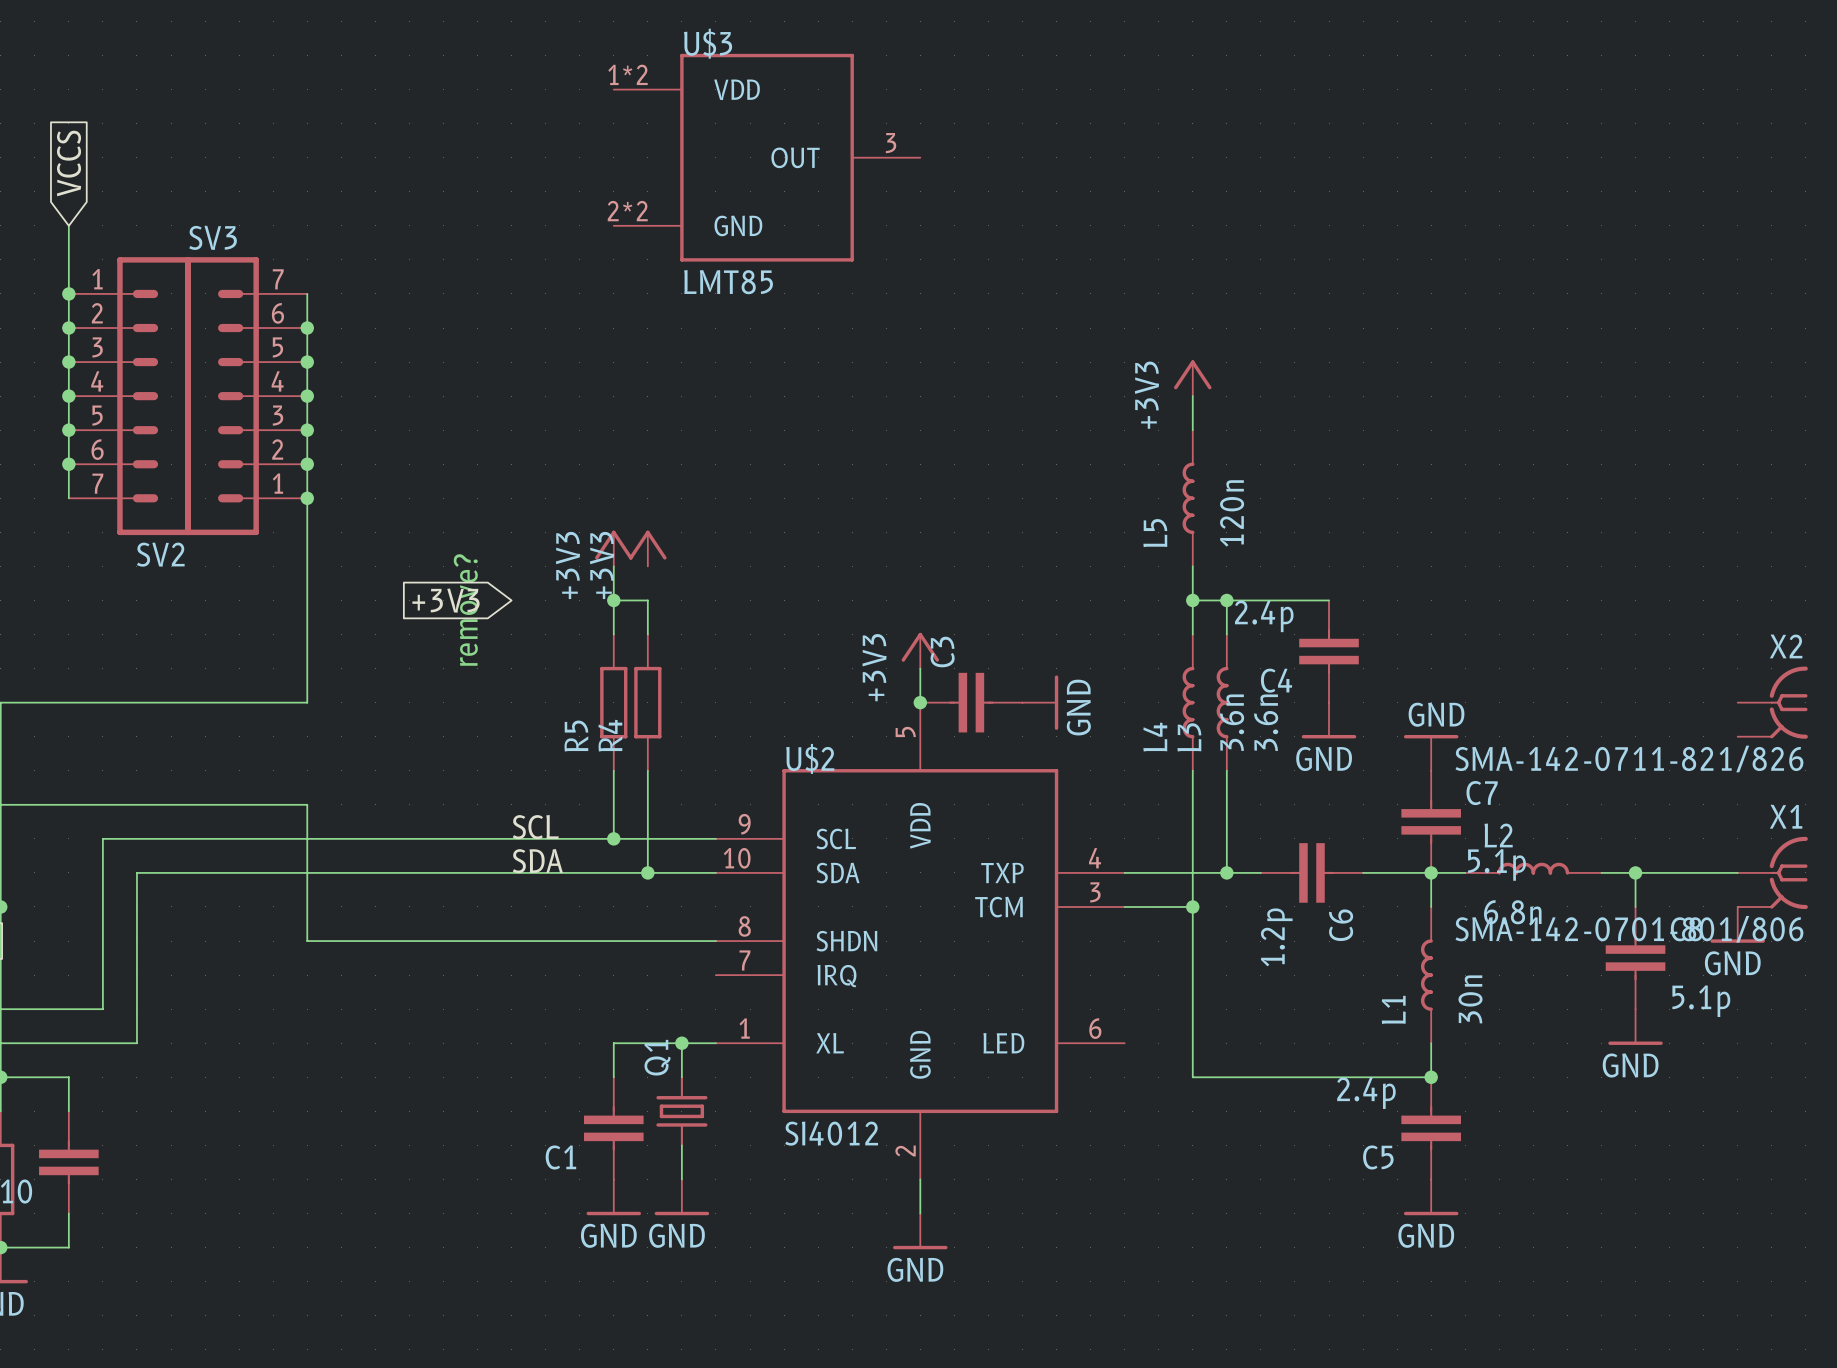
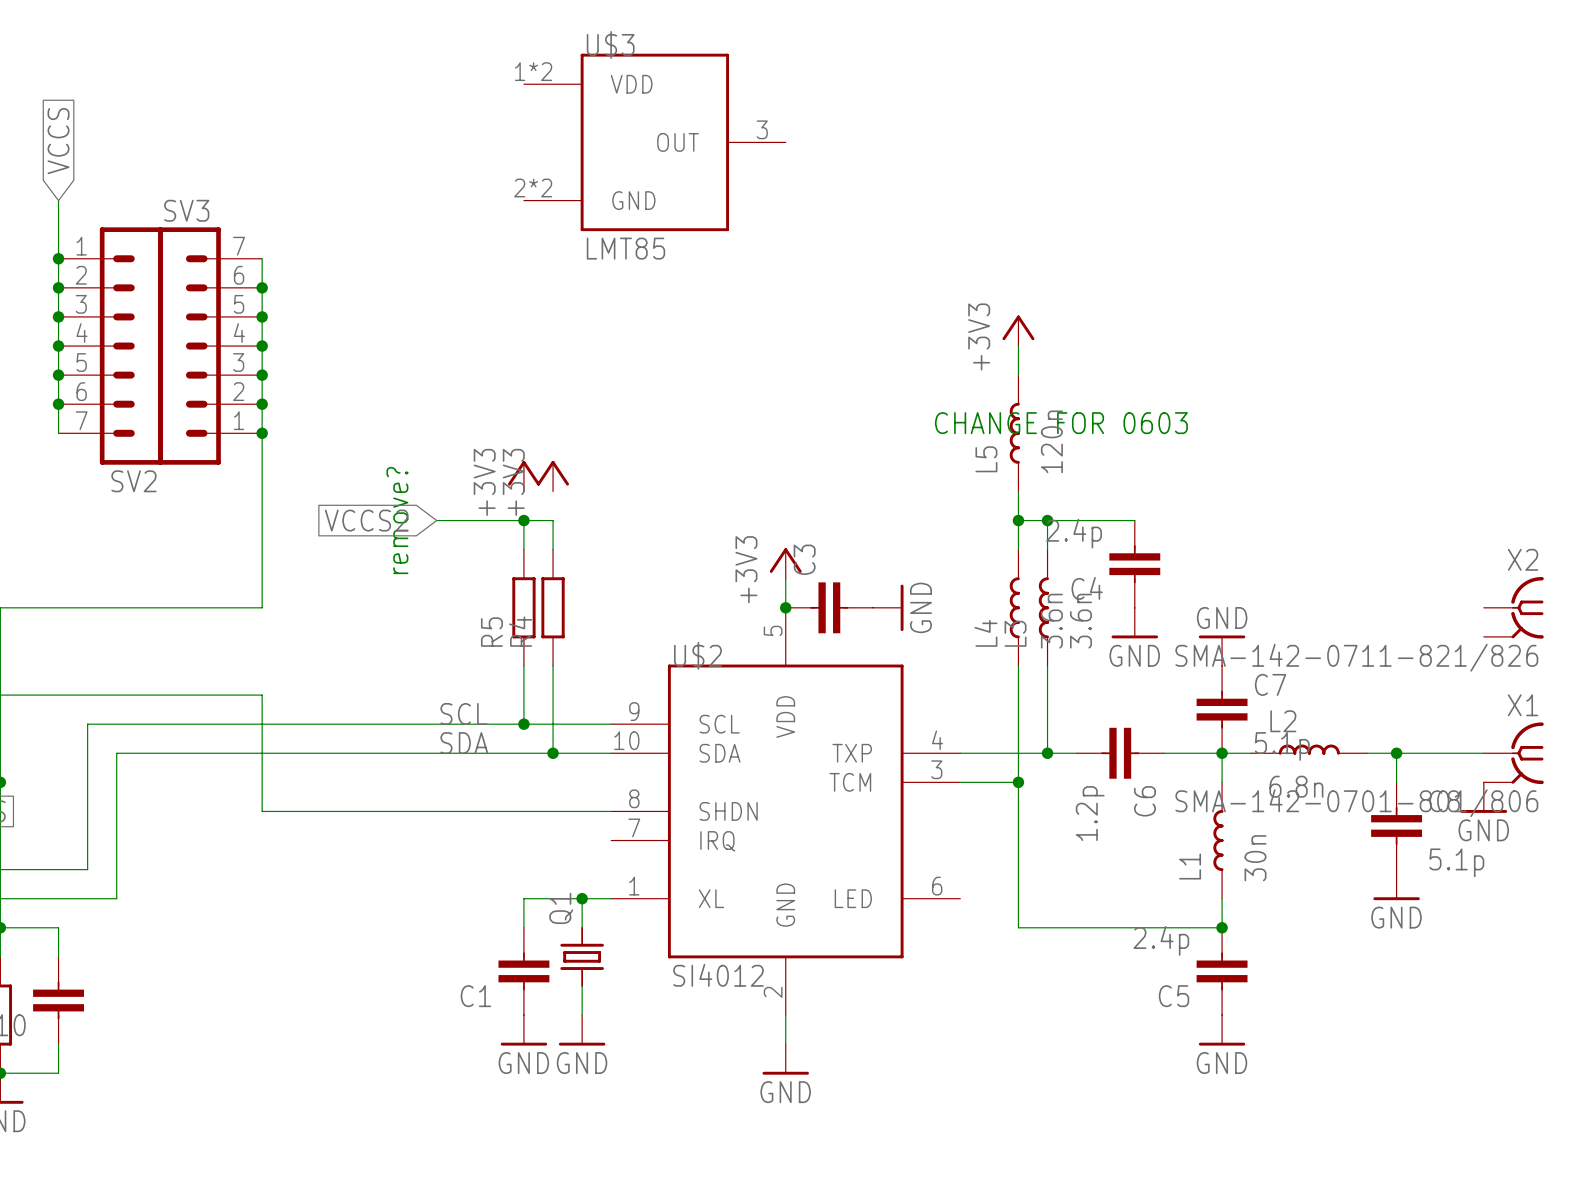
text: none -> CHANGE FOR 0603 (1061, 423)
wire: (613, 566) (613, 600) -> (436, 520) (523, 520)
global label: +3V3 (446, 600) -> VCCS2 (366, 520)

